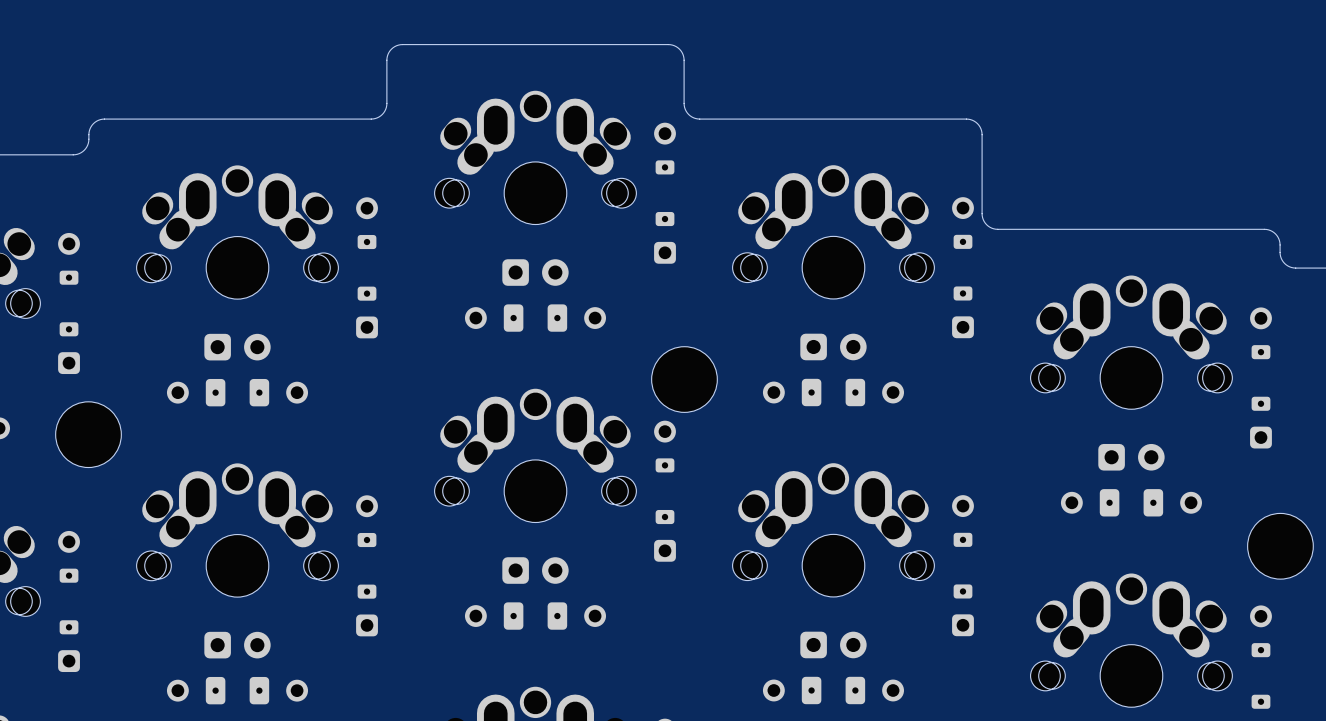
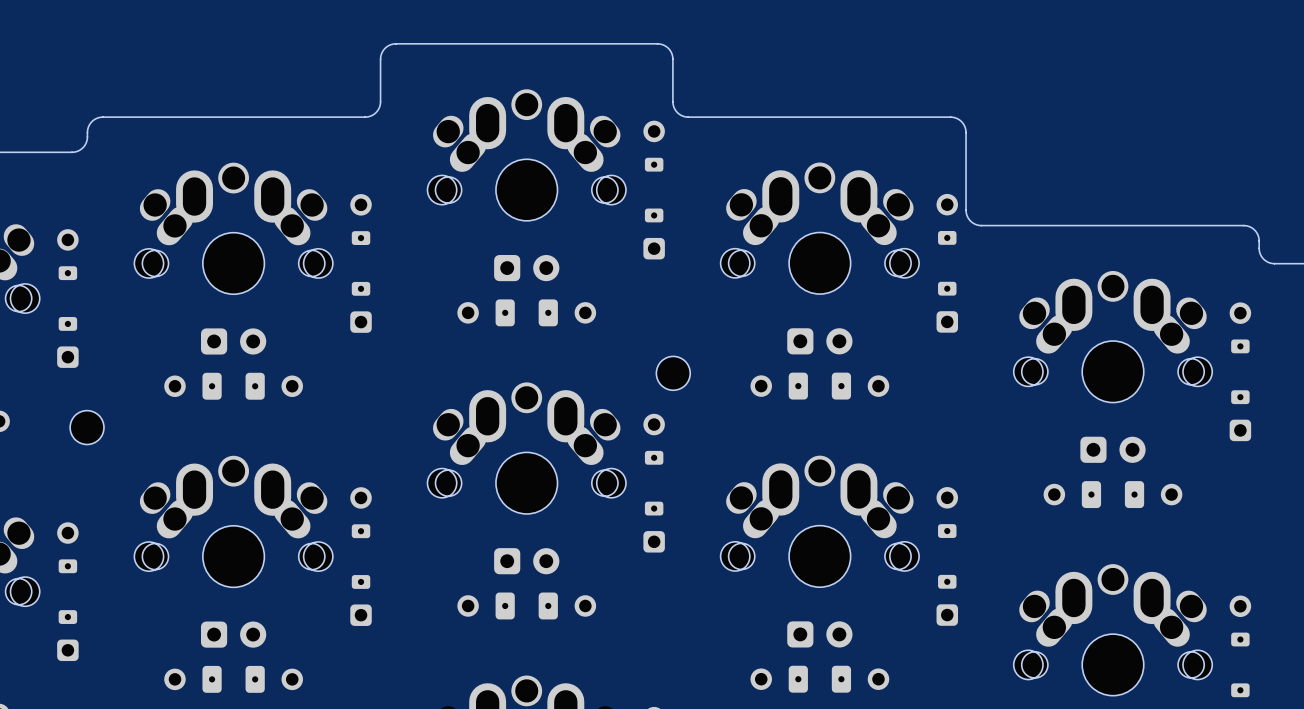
part footprint: [651, 346, 718, 413] -> [656, 356, 691, 391]
part footprint: [55, 401, 122, 468] -> [70, 410, 104, 445]
part: (1280, 546) -> none

